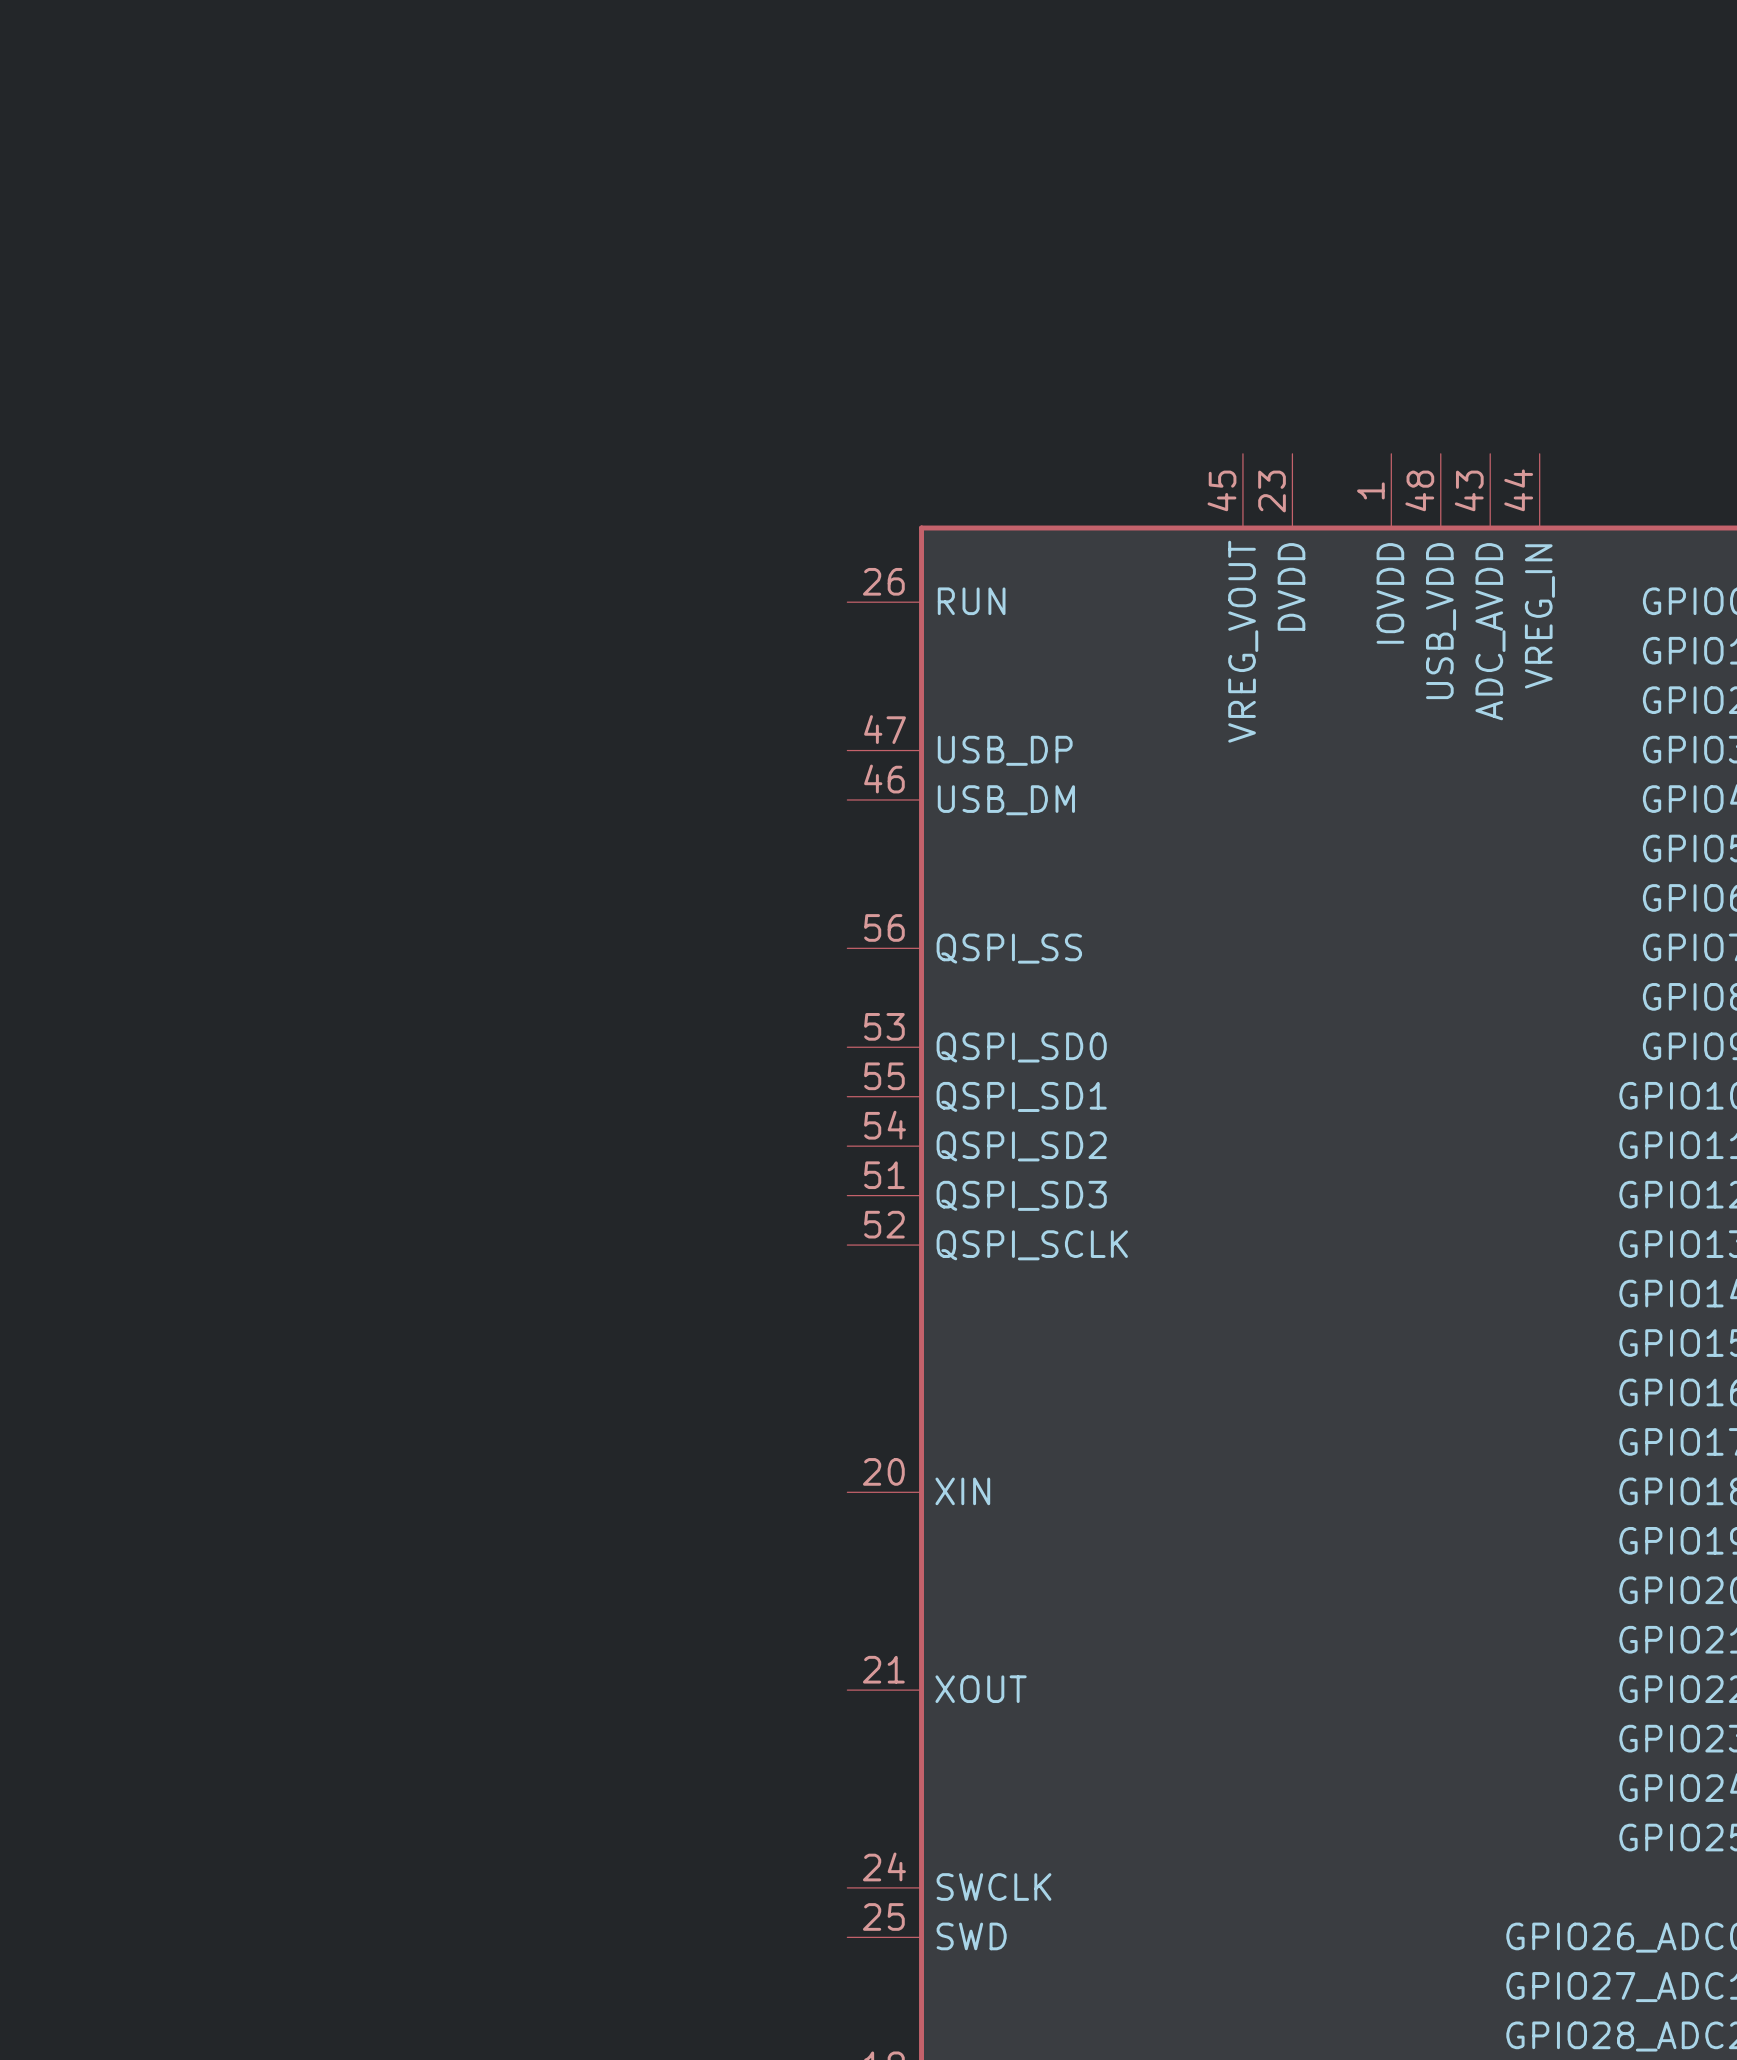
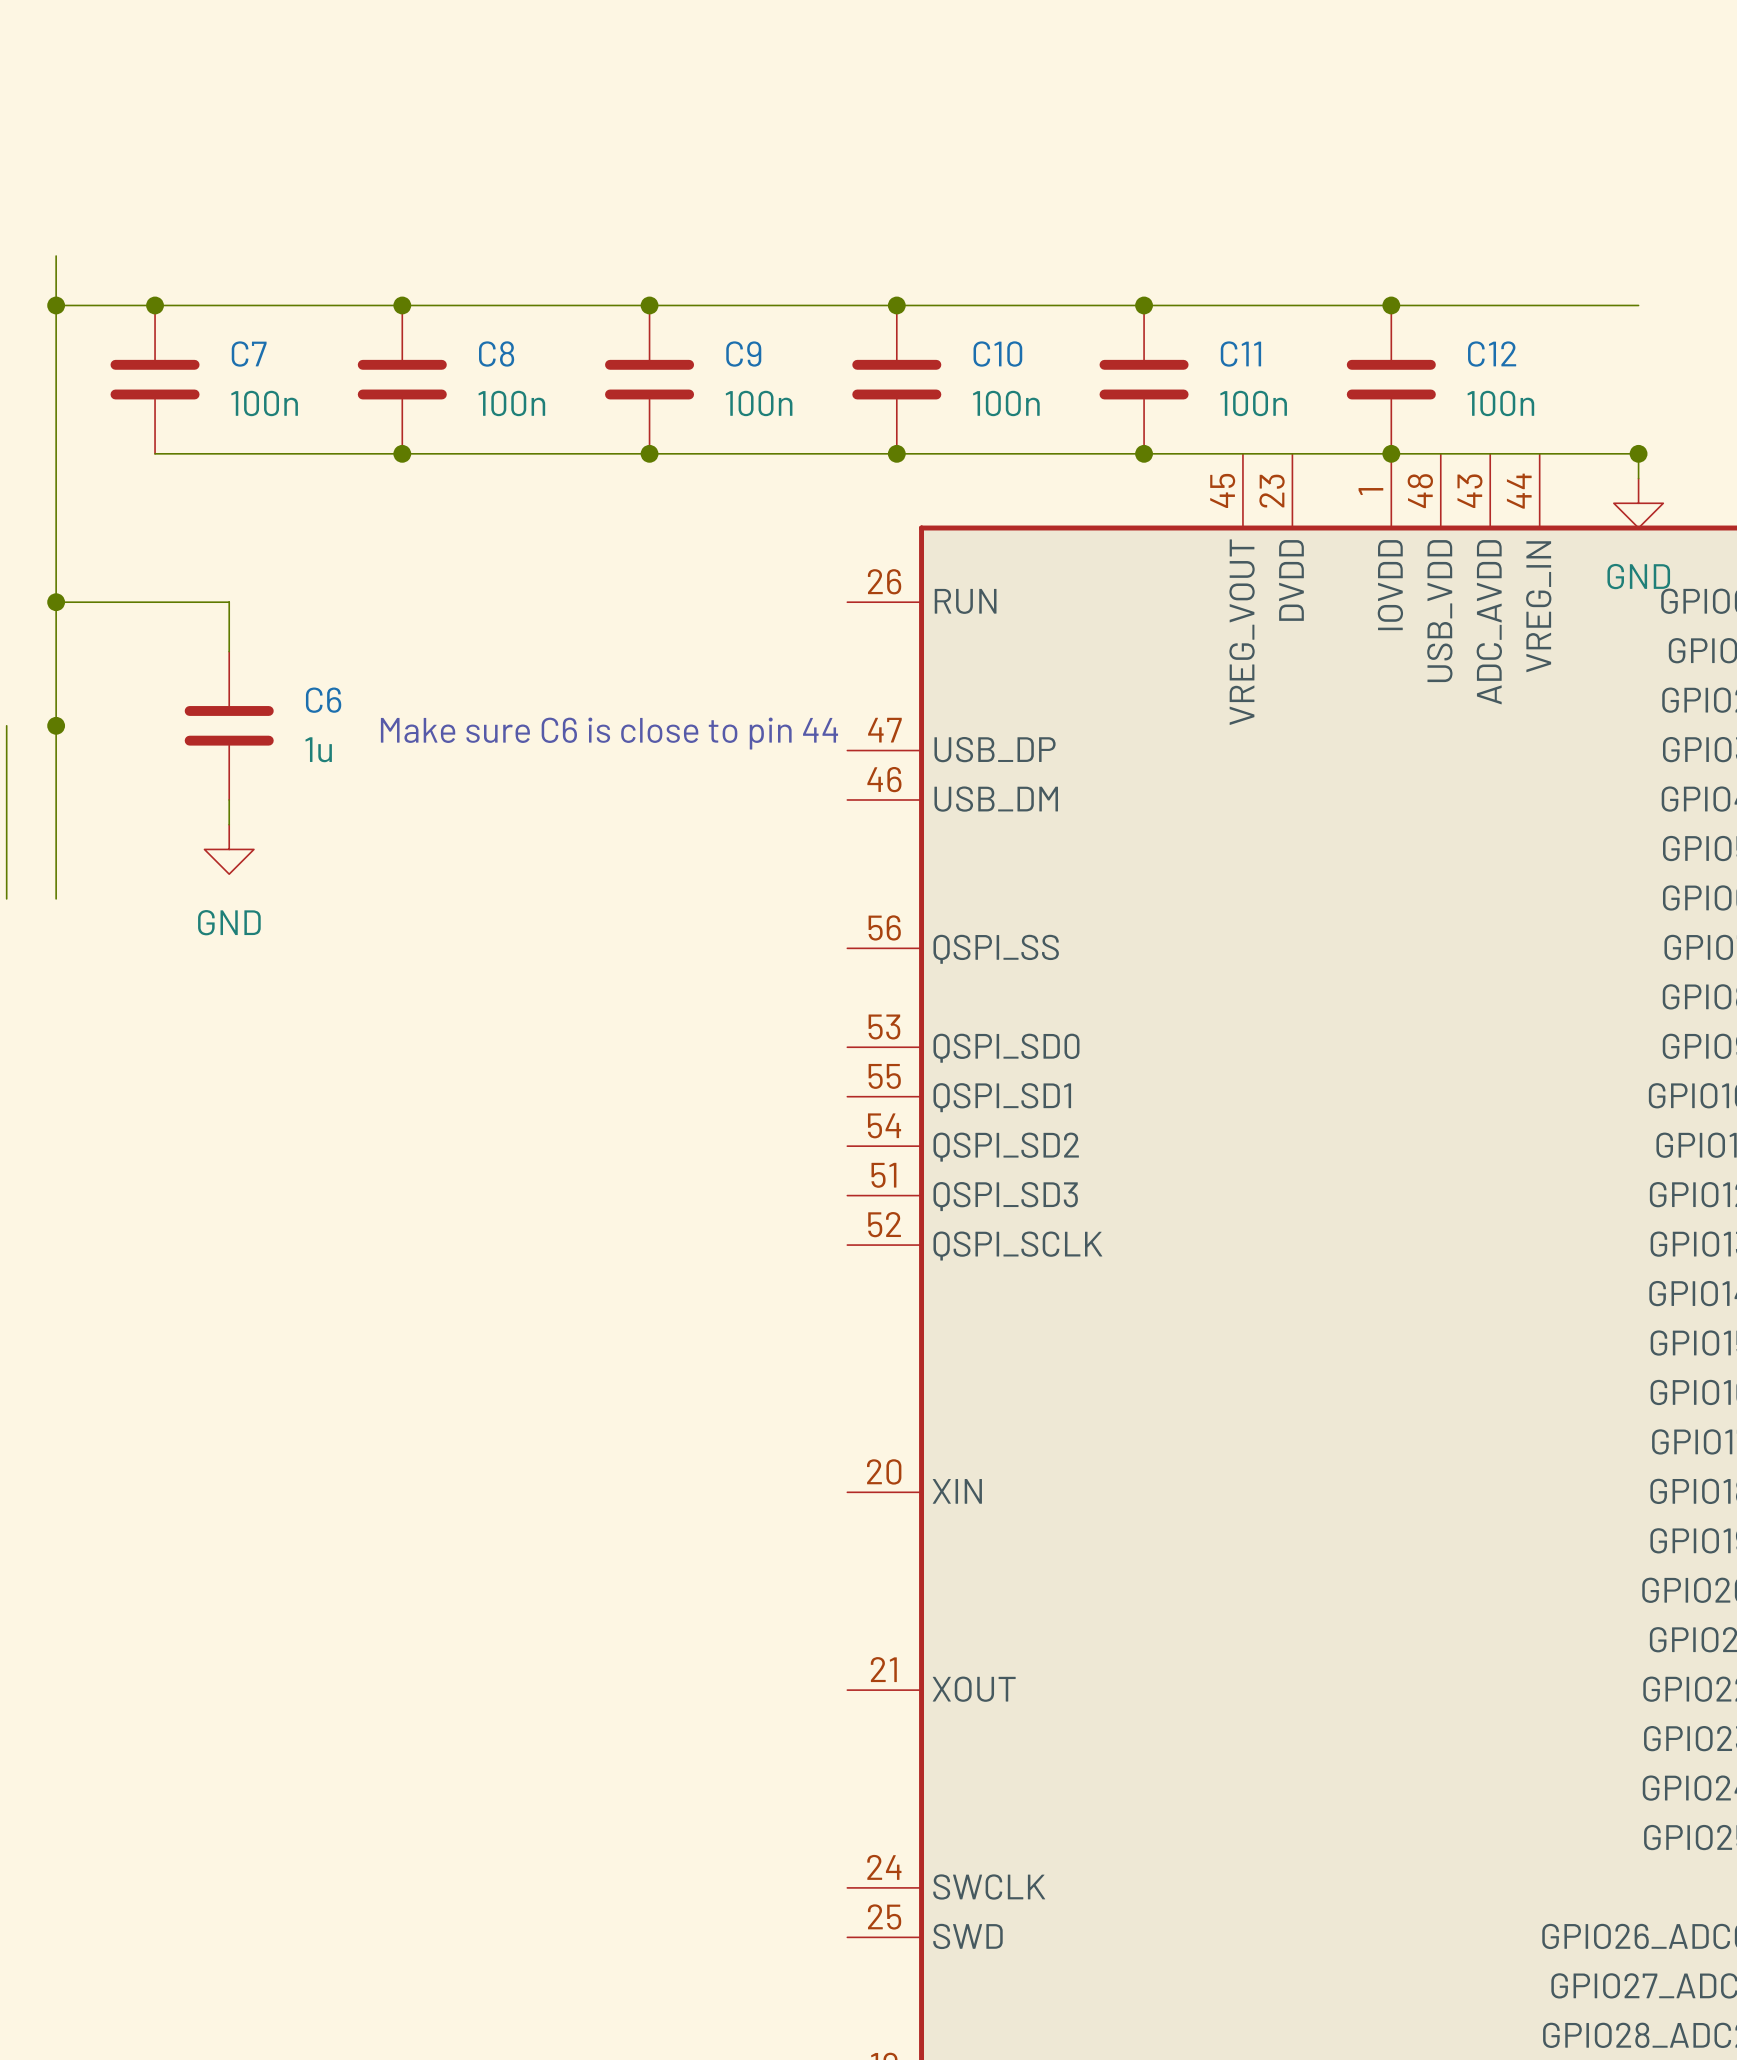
wire: none -> (56, 256) (56, 898)
wire: none -> (56, 305) (1638, 305)
junction: none -> (56, 305)
junction: none -> (155, 305)
junction: none -> (402, 305)
junction: none -> (649, 305)
junction: none -> (896, 305)
junction: none -> (1144, 305)
junction: none -> (1391, 305)
C7: none -> 100n (155, 379)
C8: none -> 100n (402, 379)
C9: none -> 100n (649, 379)
C10: none -> 100n (896, 379)
C11: none -> 100n (1144, 379)
C12: none -> 100n (1391, 379)
wire: none -> (155, 453) (1638, 453) (1638, 478)
junction: none -> (402, 453)
junction: none -> (649, 453)
junction: none -> (896, 453)
junction: none -> (1144, 453)
junction: none -> (1391, 453)
junction: none -> (1638, 453)
power symbol: none -> GND (1638, 503)
wire: none -> (56, 602) (229, 602) (229, 651)
junction: none -> (56, 602)
wire: none -> (6, 725) (6, 898)
junction: none -> (56, 725)
C6: none -> 1u (229, 725)
text: none -> Make sure C6 is close to pin 44 (609, 733)
wire: none -> (229, 799) (229, 824)
power symbol: none -> GND (229, 849)

